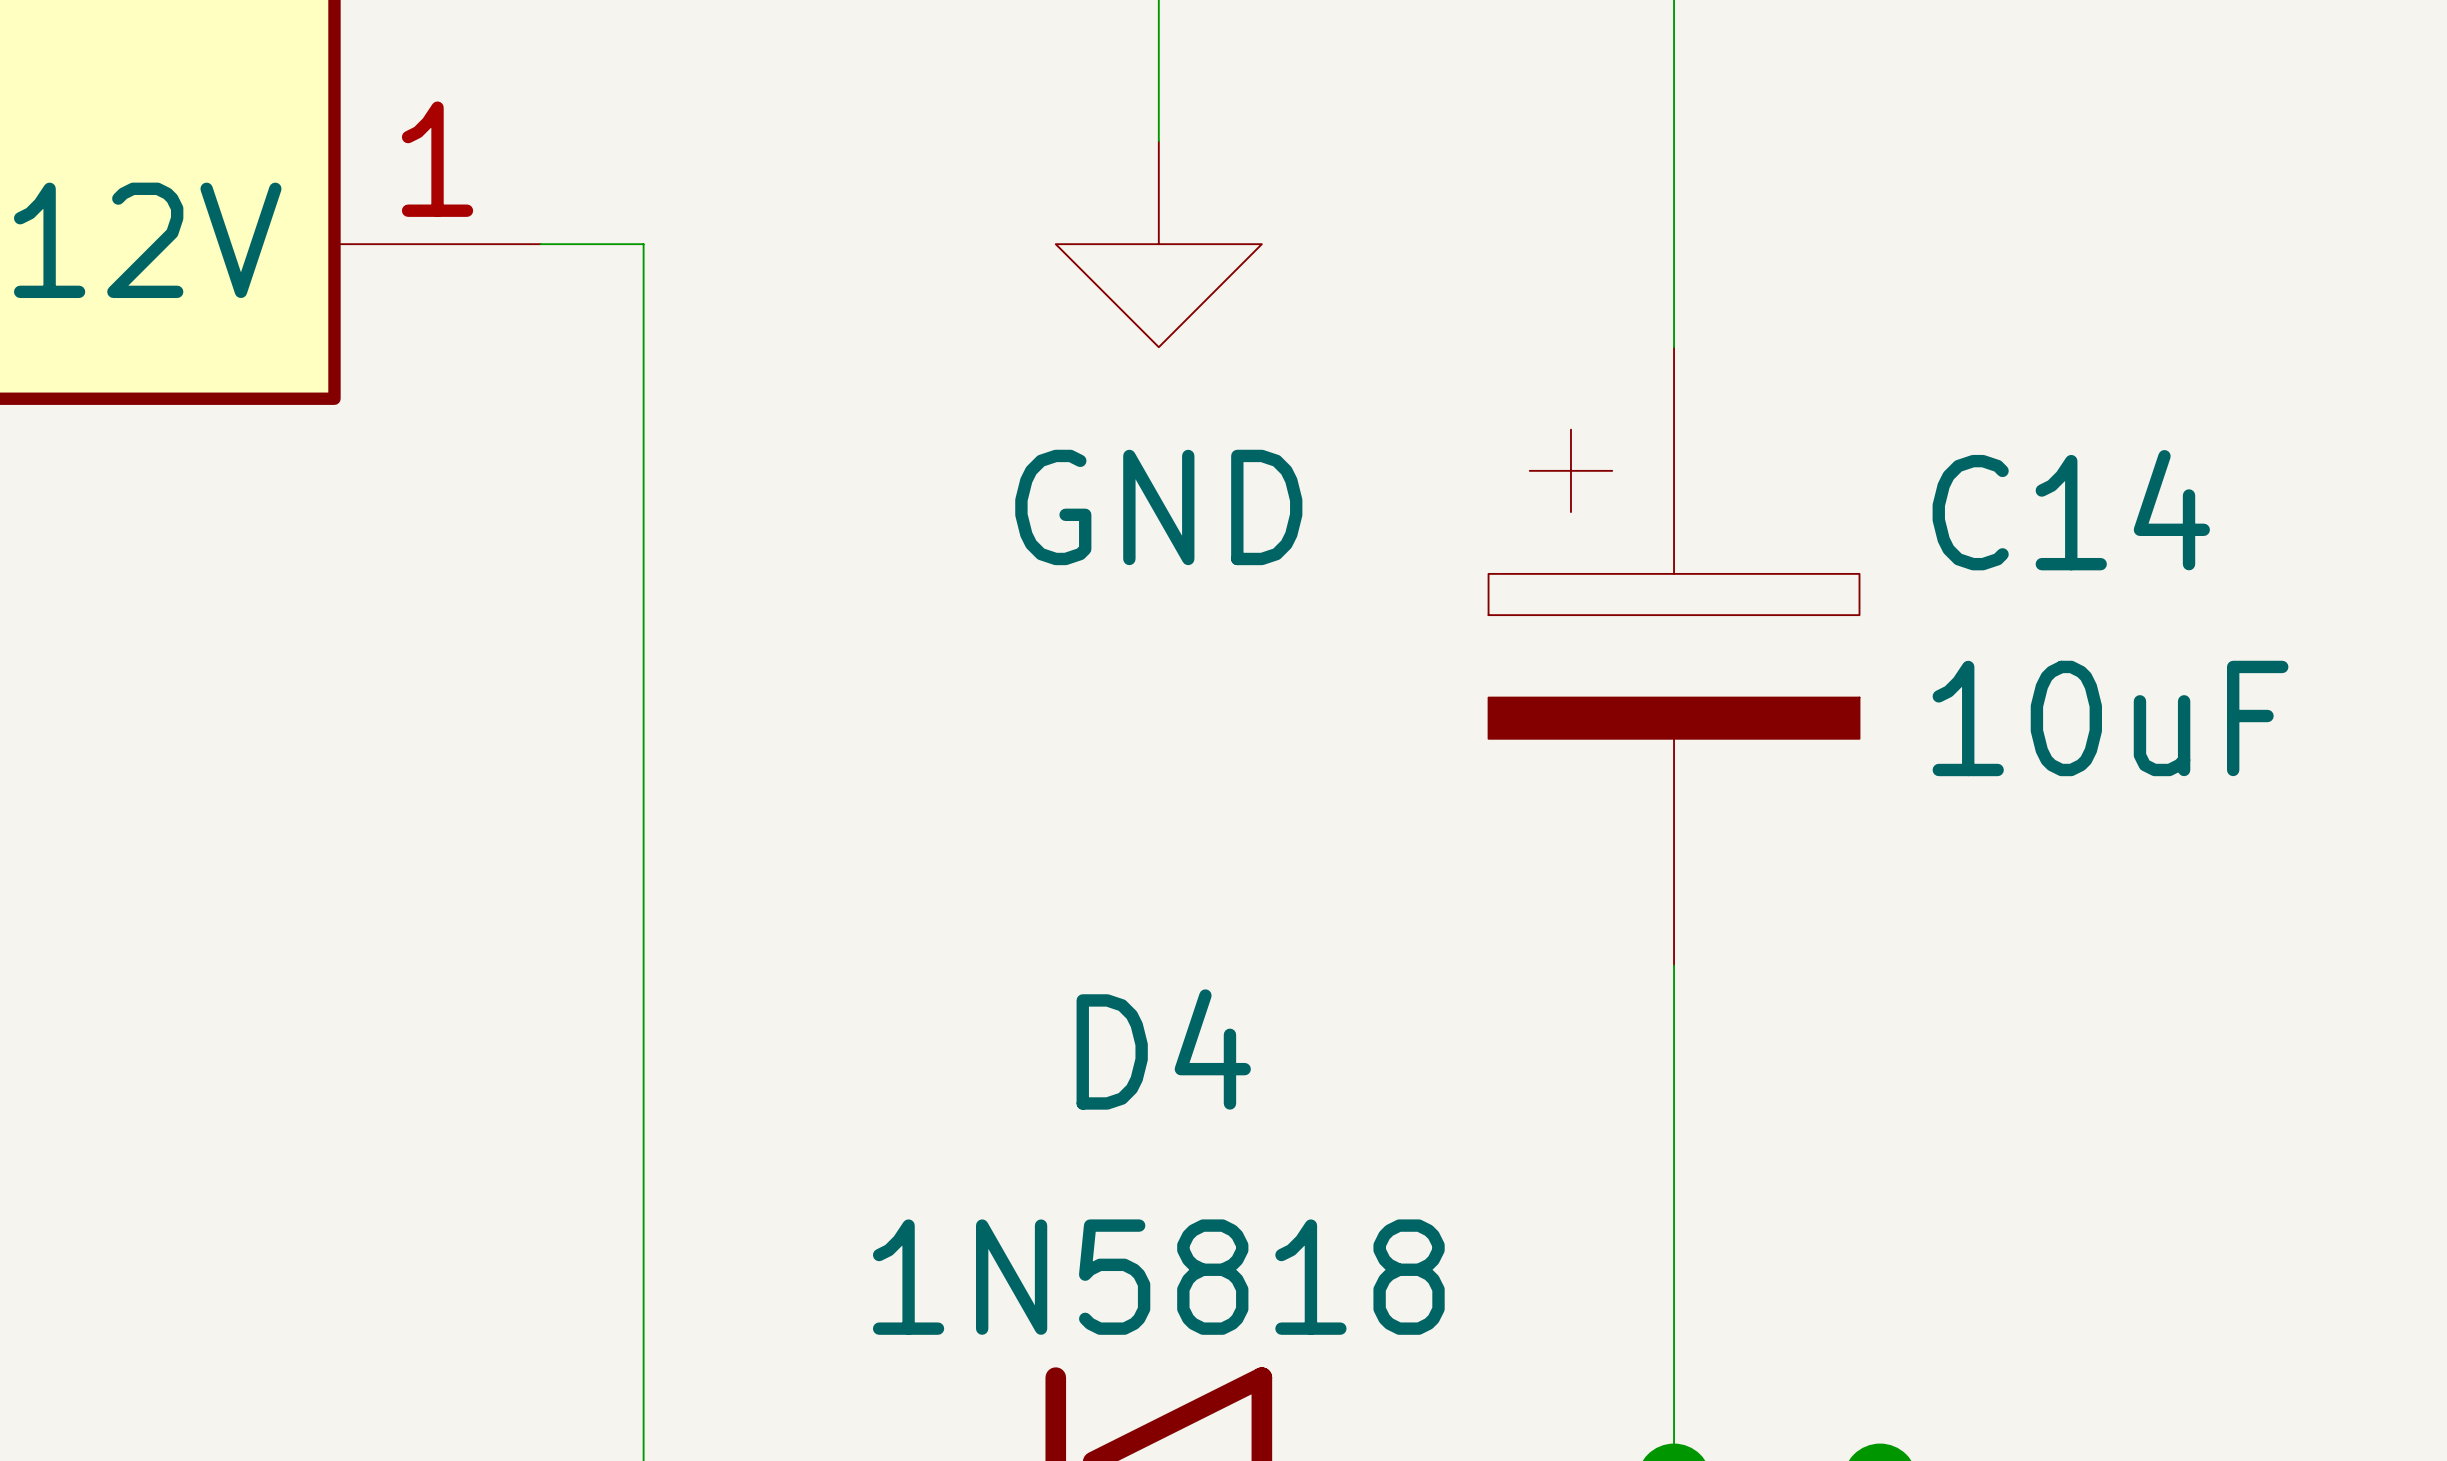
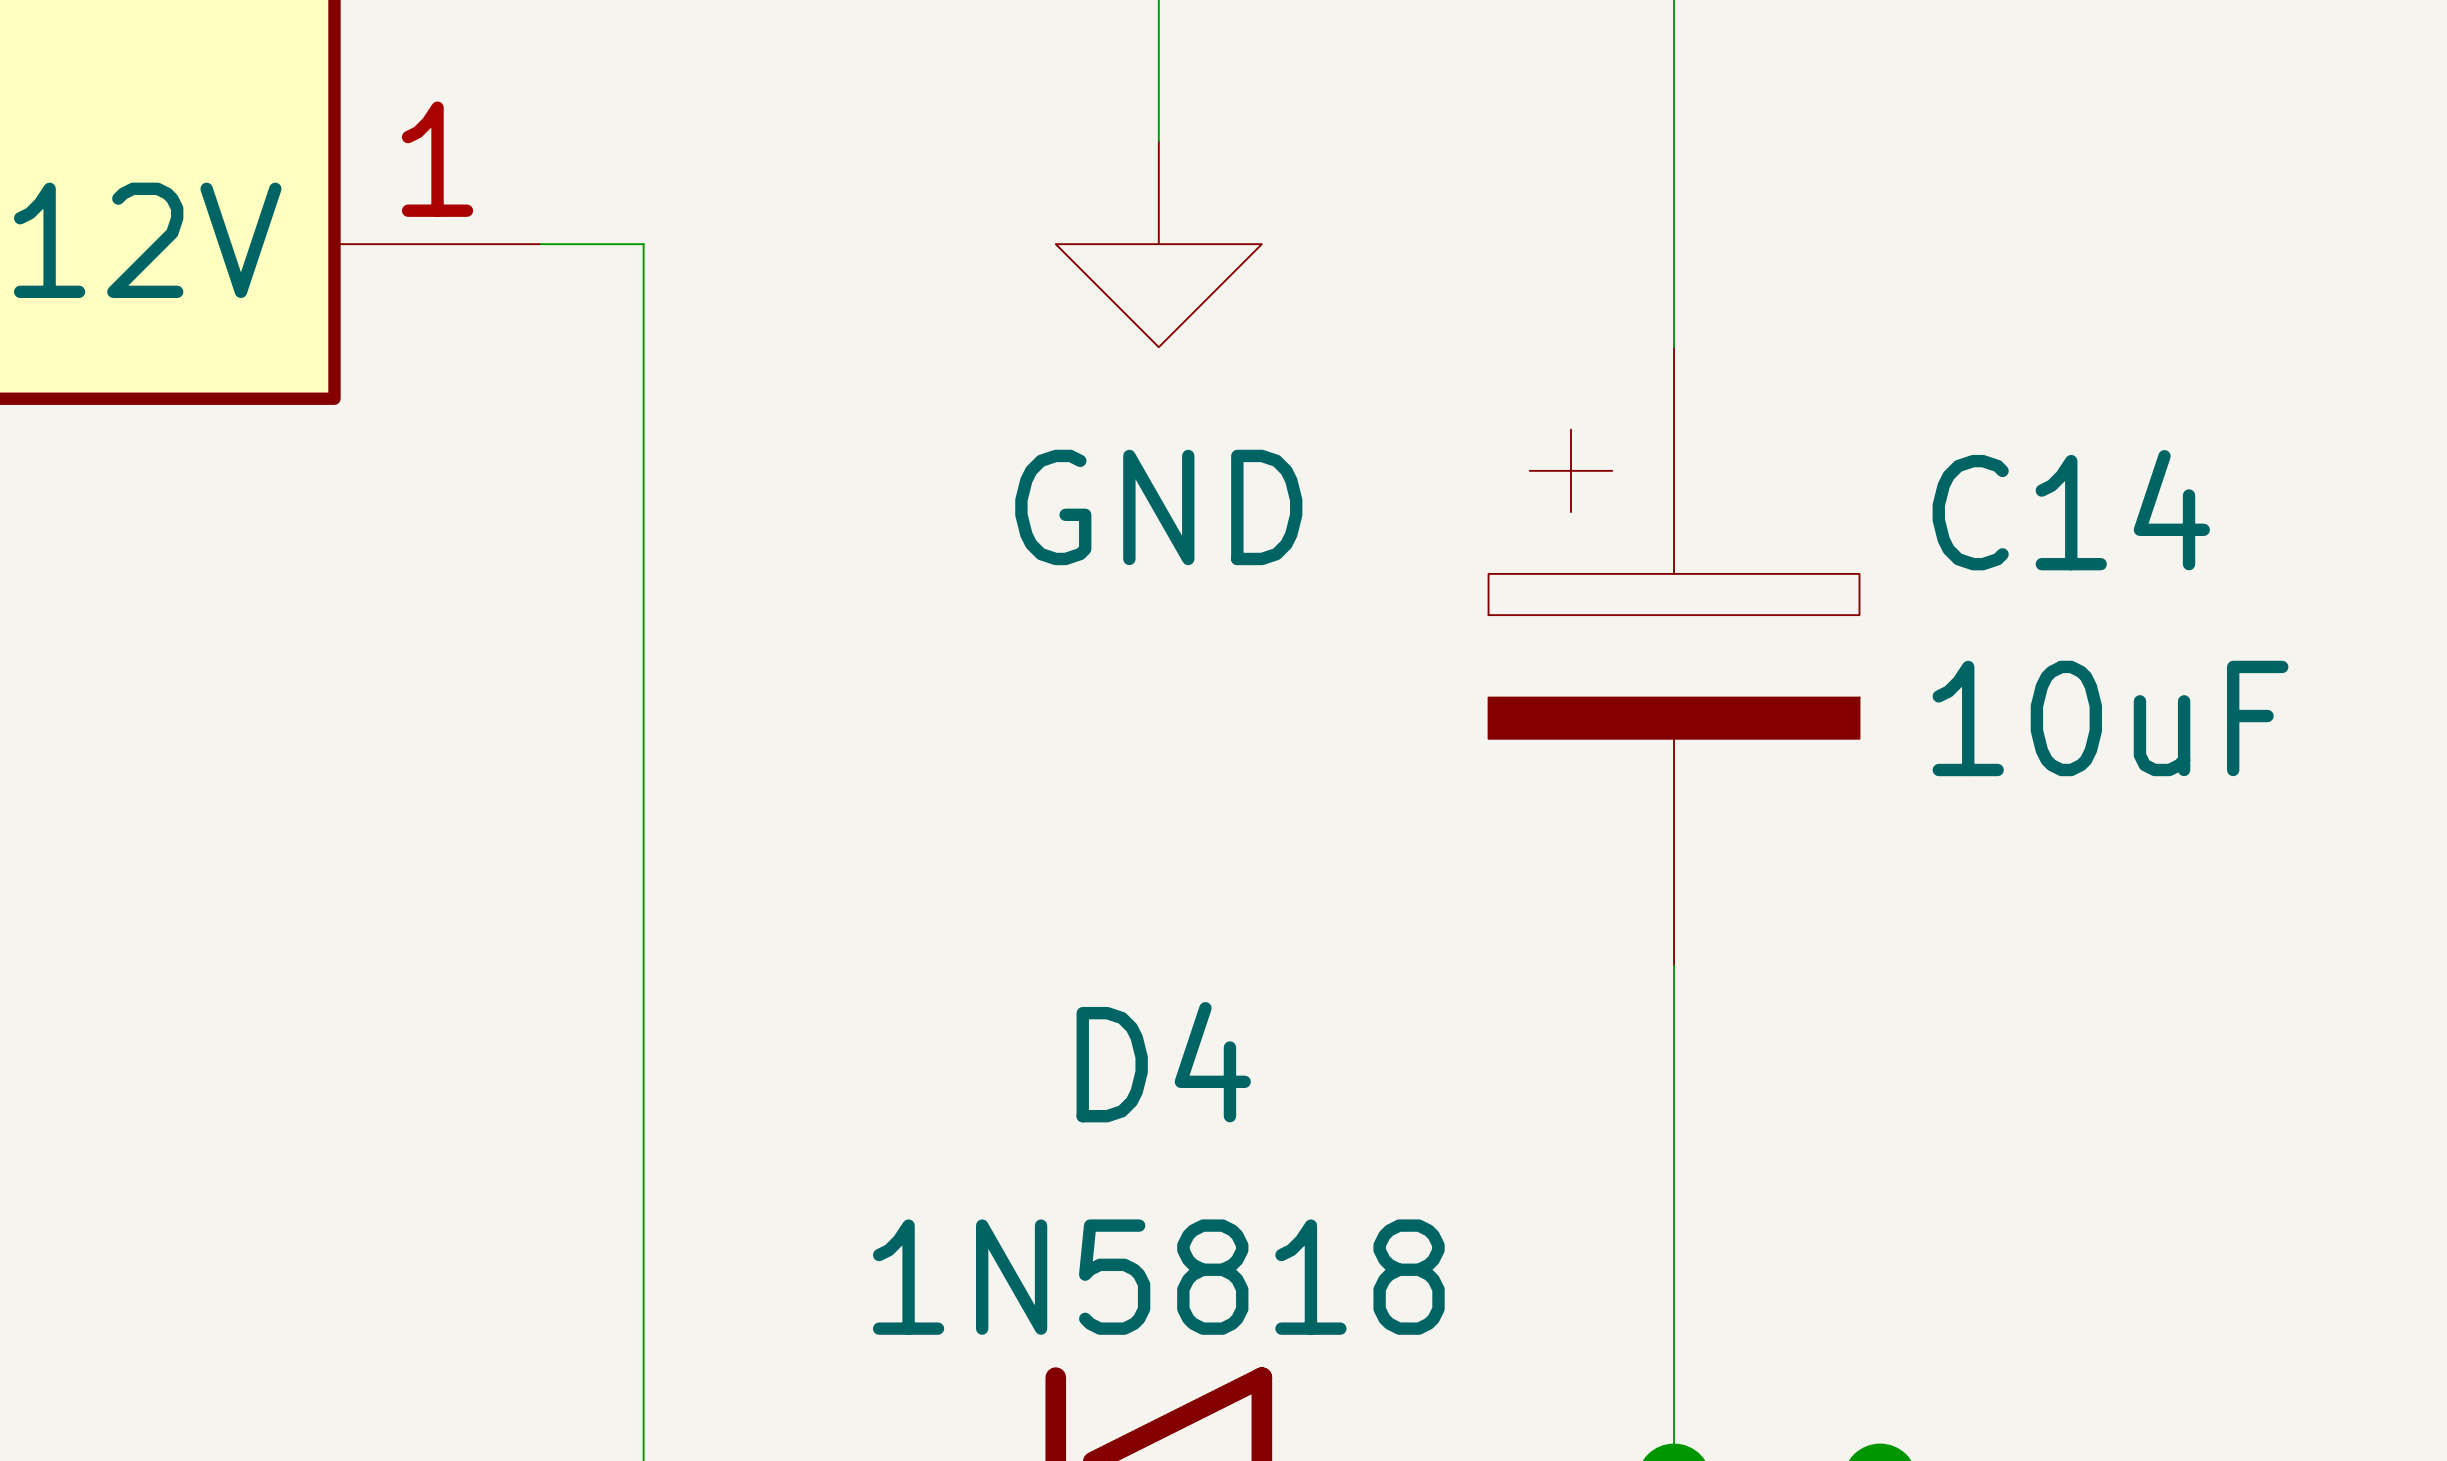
D4 name position: D4 (1163, 1049) -> D4 (1163, 1062)

